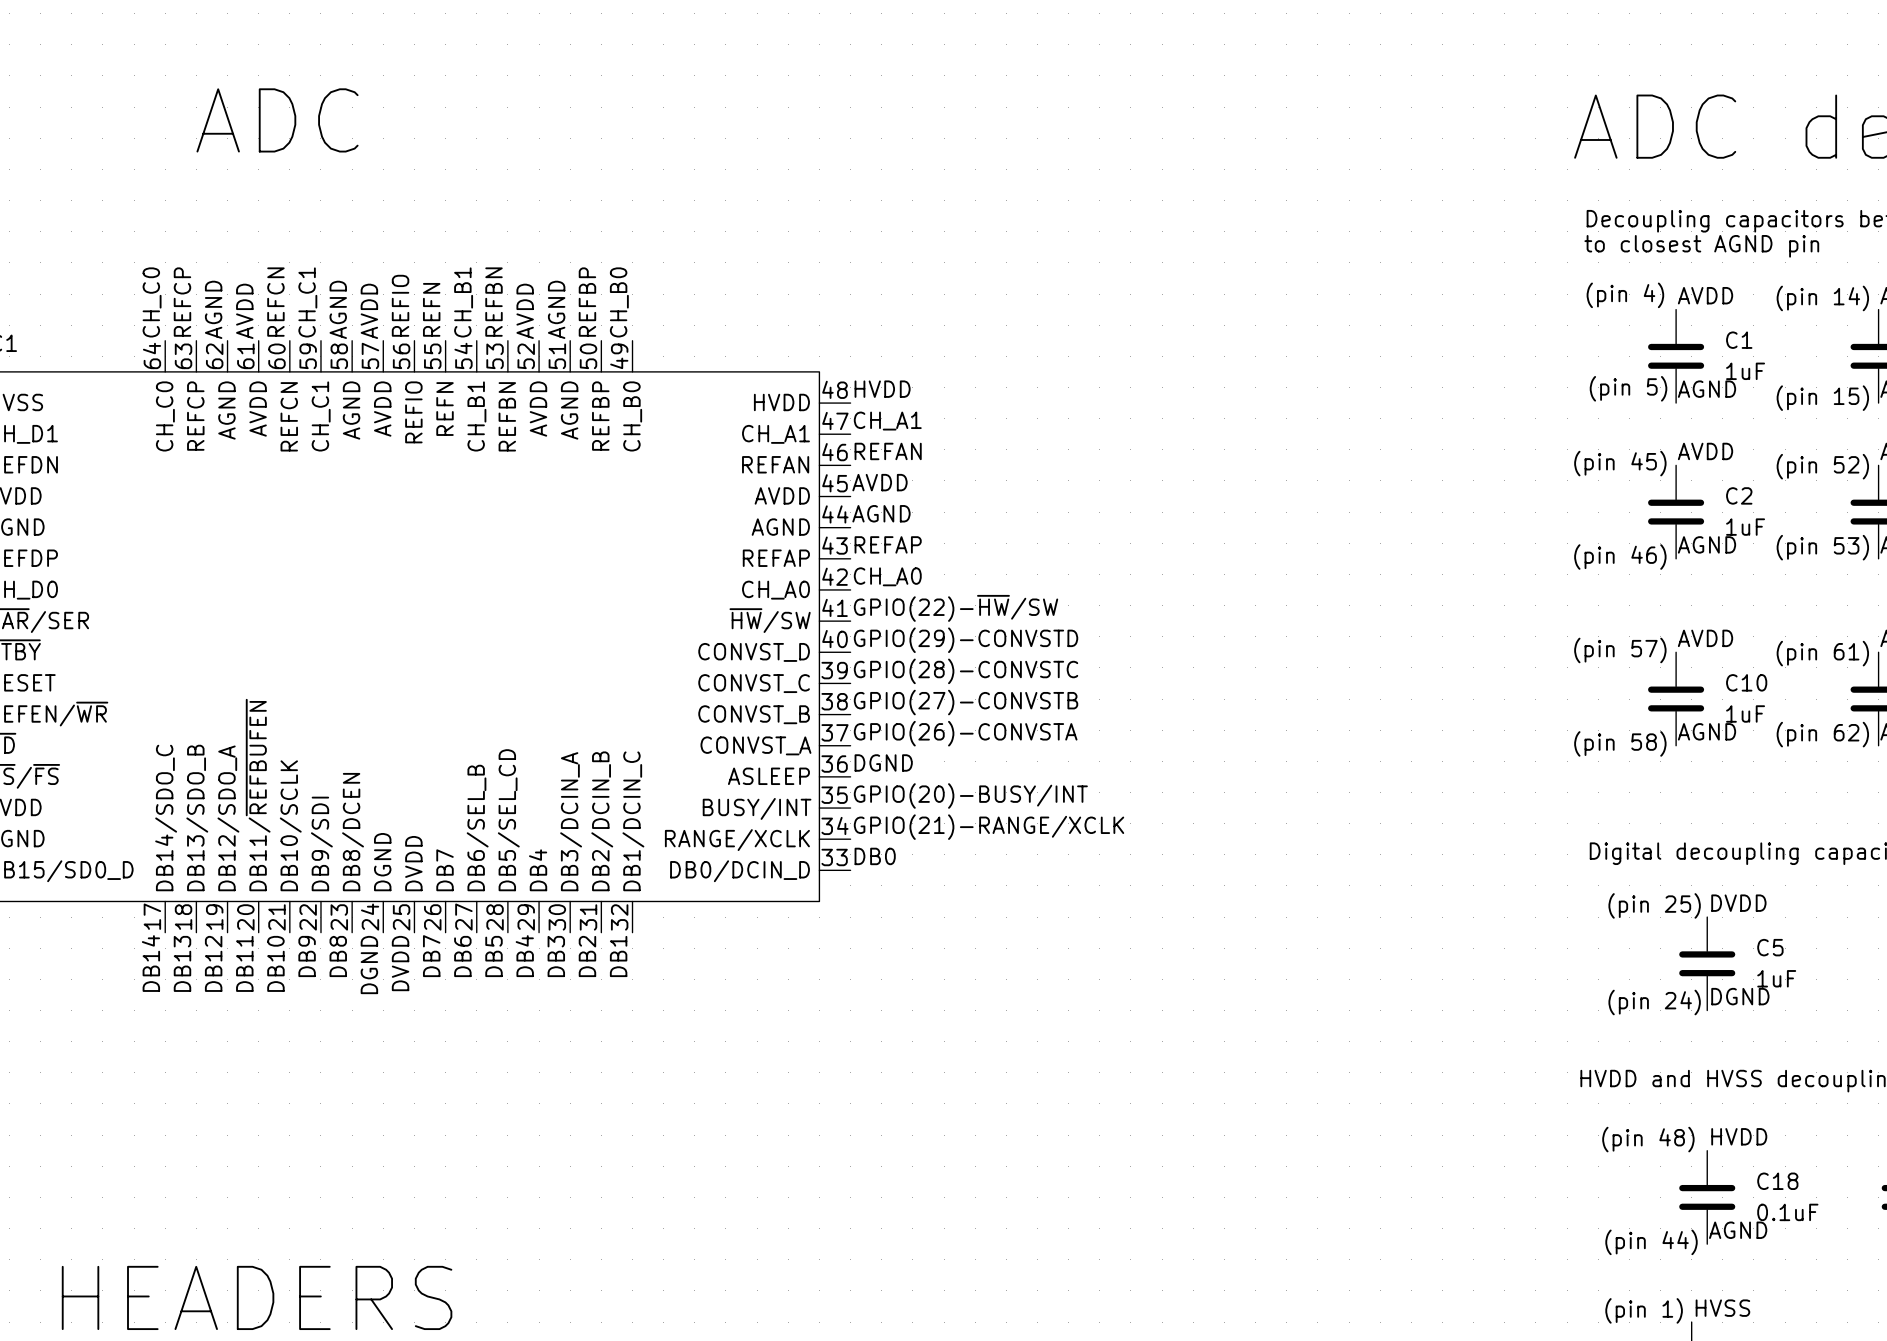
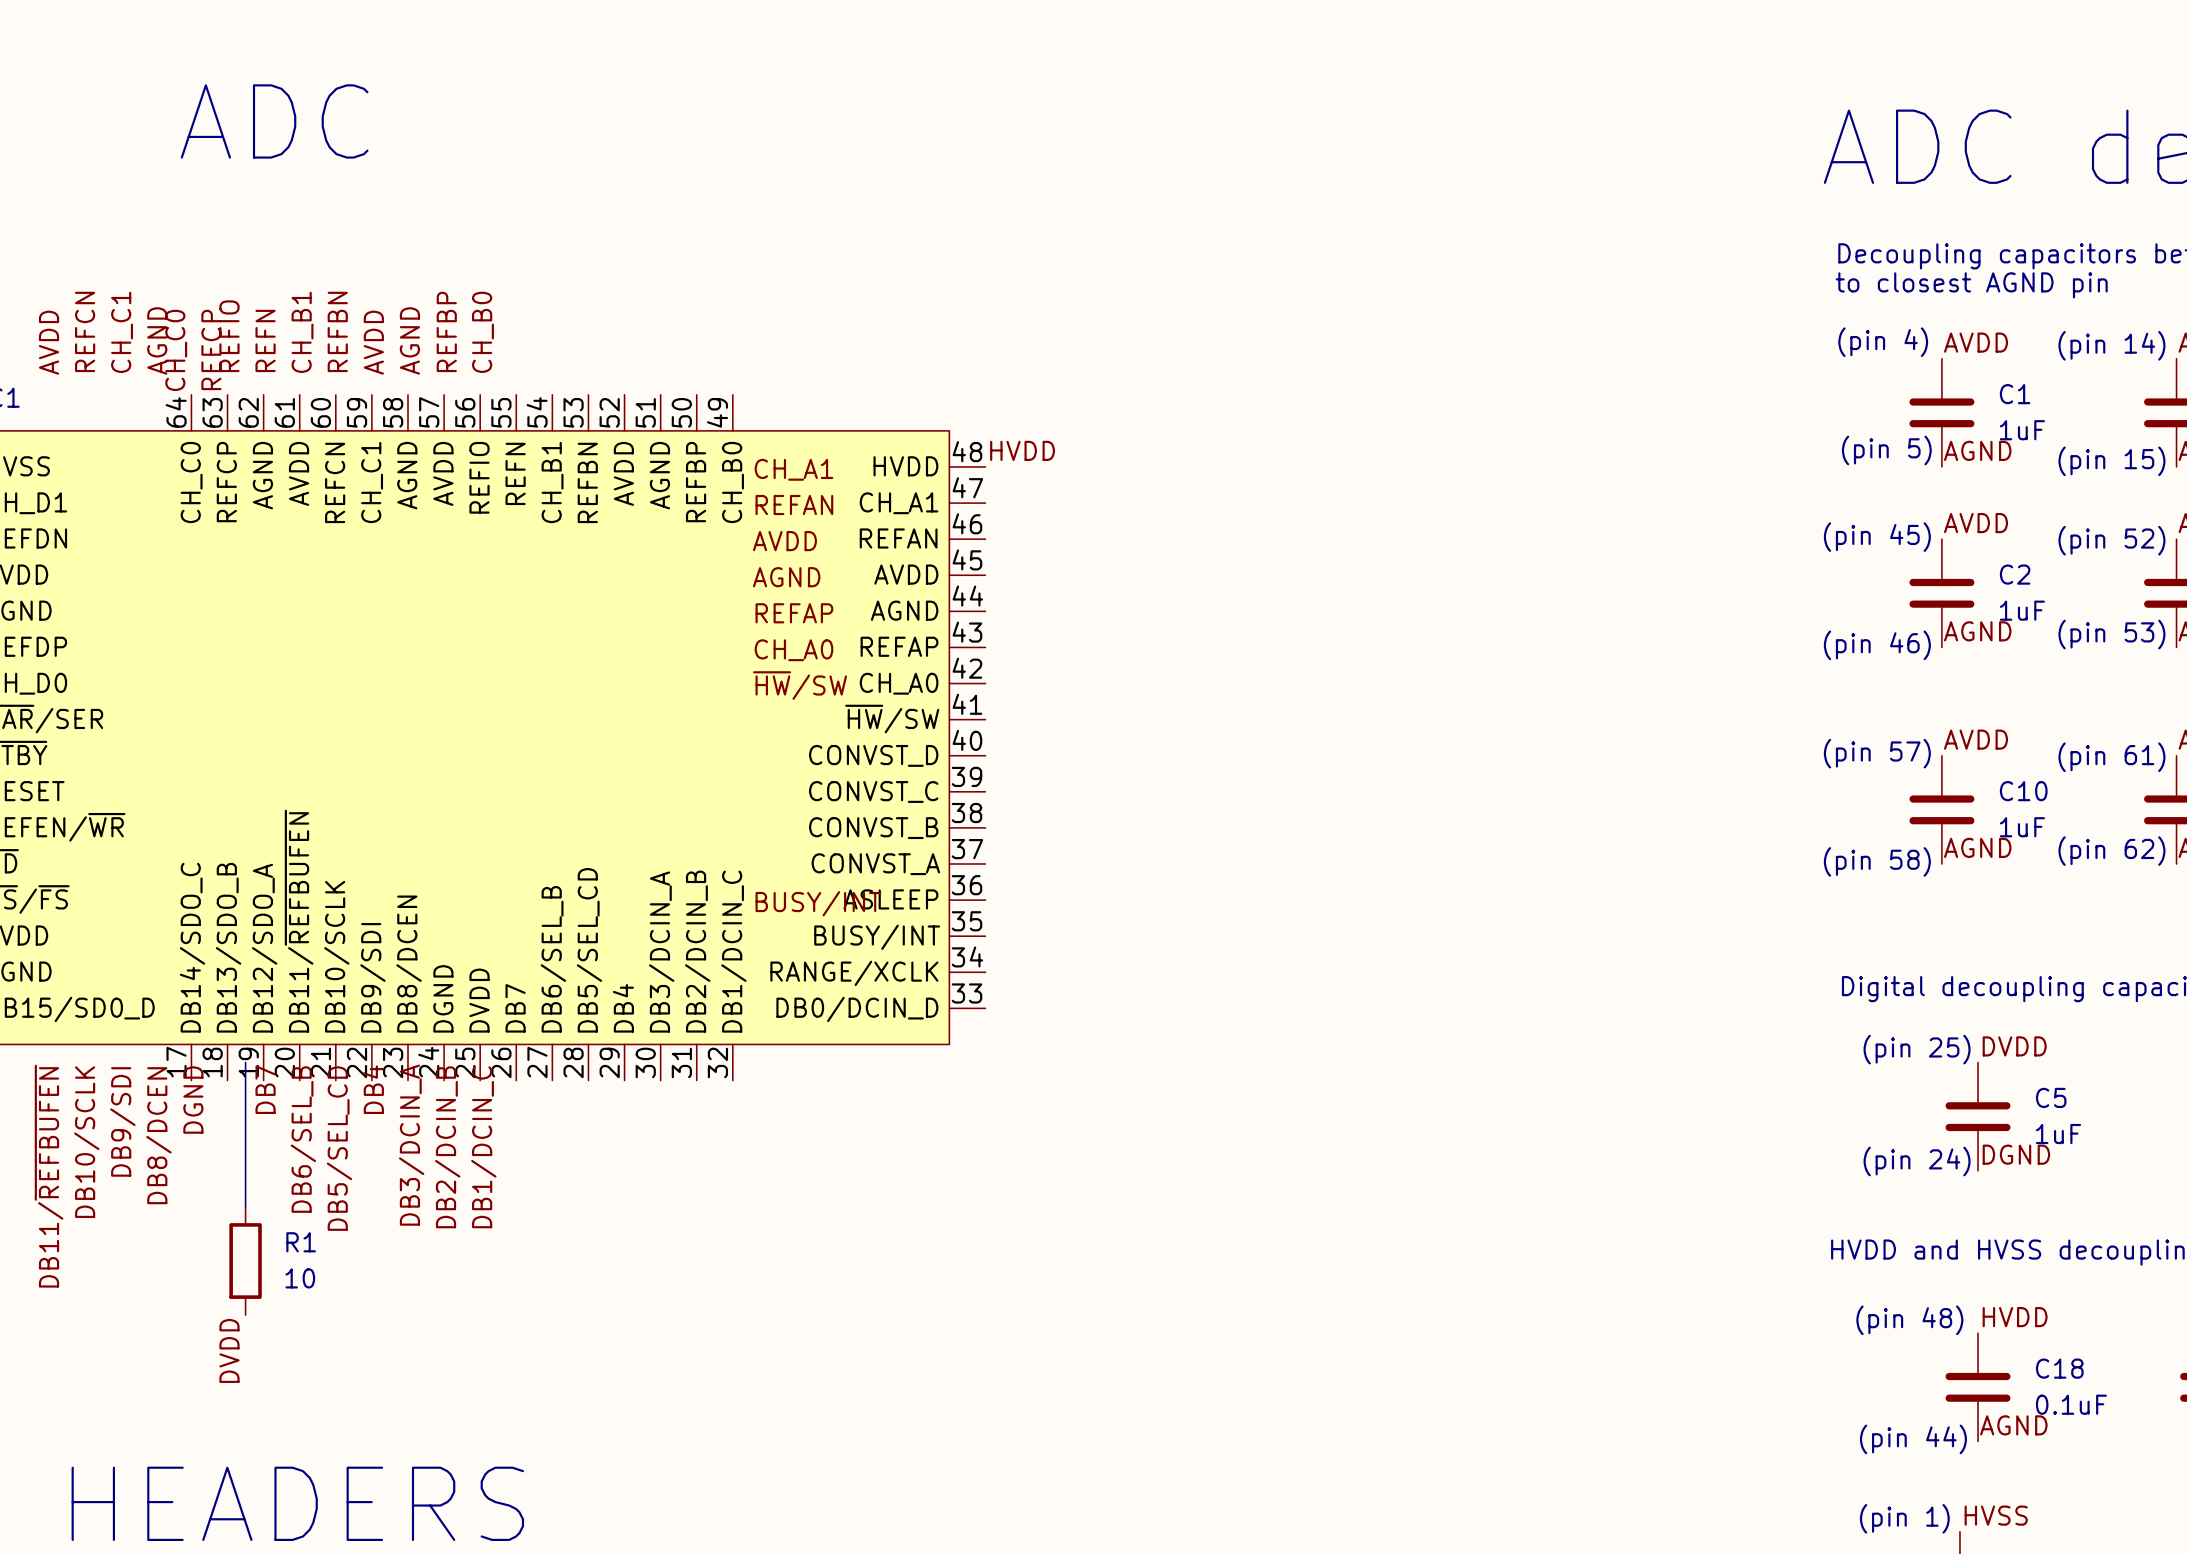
text position: ADC (277, 120) -> ADC (274, 121)
label: none -> AGND (157, 340)
label: none -> AVDD (49, 342)
label: none -> AVDD (373, 342)
label position: REFCN (275, 302) -> REFCN (85, 331)
label position: CH_C1 (307, 302) -> CH_C1 (122, 332)
label position: CH_B1 (463, 302) -> CH_B1 (302, 332)
label position: REFBN (494, 302) -> REFBN (337, 331)
label position: REFBP (587, 302) -> REFBP (446, 331)
label position: CH_B0 (619, 302) -> CH_B0 (482, 332)
label position: REFIO (400, 305) -> REFIO (229, 336)
label: AGND (213, 309) -> none
label position: AGND (338, 309) -> AGND (409, 340)
label position: REFN (431, 309) -> REFN (265, 340)
label: AGND (556, 309) -> none
label: AVDD (244, 311) -> none
label: AVDD (369, 311) -> none
label: AVDD (525, 311) -> none
label position: CH_A1 (887, 421) -> CH_A1 (793, 469)
label position: REFAN (888, 451) -> REFAN (794, 505)
label: none -> AVDD (784, 541)
label: AVDD (879, 482) -> none
label: none -> AGND (786, 577)
label: AGND (881, 513) -> none
label position: REFAP (888, 544) -> REFAP (794, 613)
label position: CH_A0 (887, 576) -> CH_A0 (793, 650)
label: none -> ~{HW}/SW (800, 685)
label: GPIO(22)-~{HW}/SW (956, 608) -> none
label: GPIO(29)-CONVSTD (966, 640) -> none
label: GPIO(28)-CONVSTC (966, 671) -> none
label: GPIO(27)-CONVSTB (966, 702) -> none
label: GPIO(26)-CONVSTA (965, 733) -> none
label: DGND (883, 762) -> none
label: none -> BUSY/INT (818, 903)
label: GPIO(20)-BUSY/INT (970, 795) -> none
label: GPIO(21)-RANGE/XCLK (989, 827) -> none
label: DB0 (875, 856) -> none
wire: none -> (245, 1062) (245, 1206)
label: DB9 (307, 956) -> none
label: DB8 (338, 956) -> none
label position: DB7 (431, 956) -> DB7 (265, 1089)
label: DB6 (462, 956) -> none
label: DB5 (494, 956) -> none
label position: DB4 (524, 956) -> DB4 (373, 1089)
label: DB3 (556, 956) -> none
label: DB2 (587, 956) -> none
label: DB1 (618, 956) -> none
label: DB14 (150, 963) -> none
label: DB13 (182, 963) -> none
label: DB12 (213, 963) -> none
label: DB11 (244, 963) -> none
label: DB10 (275, 963) -> none
label position: DVDD (400, 963) -> DVDD (229, 1350)
label position: DGND (369, 965) -> DGND (193, 1100)
label: none -> DB9/SDI (122, 1121)
label: none -> DB8/DCEN (159, 1135)
label: none -> DB6/SEL_B (303, 1139)
label: none -> DB10/SCLK (86, 1142)
label: none -> DB3/DCIN_A (411, 1145)
label: none -> DB2/DCIN_B (447, 1147)
label: none -> DB1/DCIN_C (483, 1147)
label: none -> DB5/SEL_CD (339, 1148)
label: none -> DB11/~{REFBUFEN} (49, 1176)
R1: none -> 10 (245, 1261)

